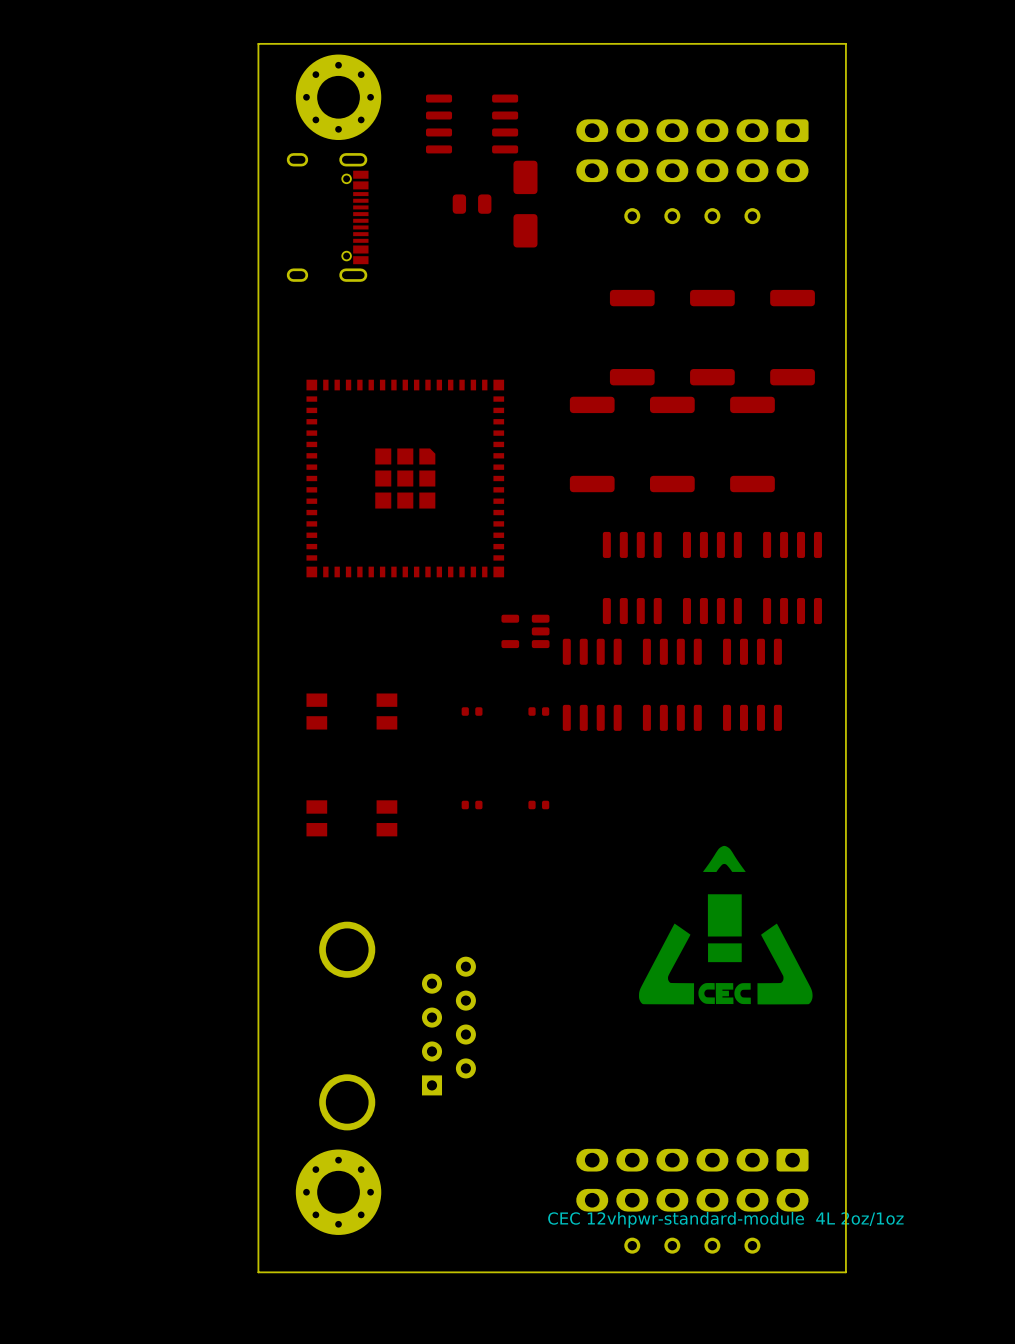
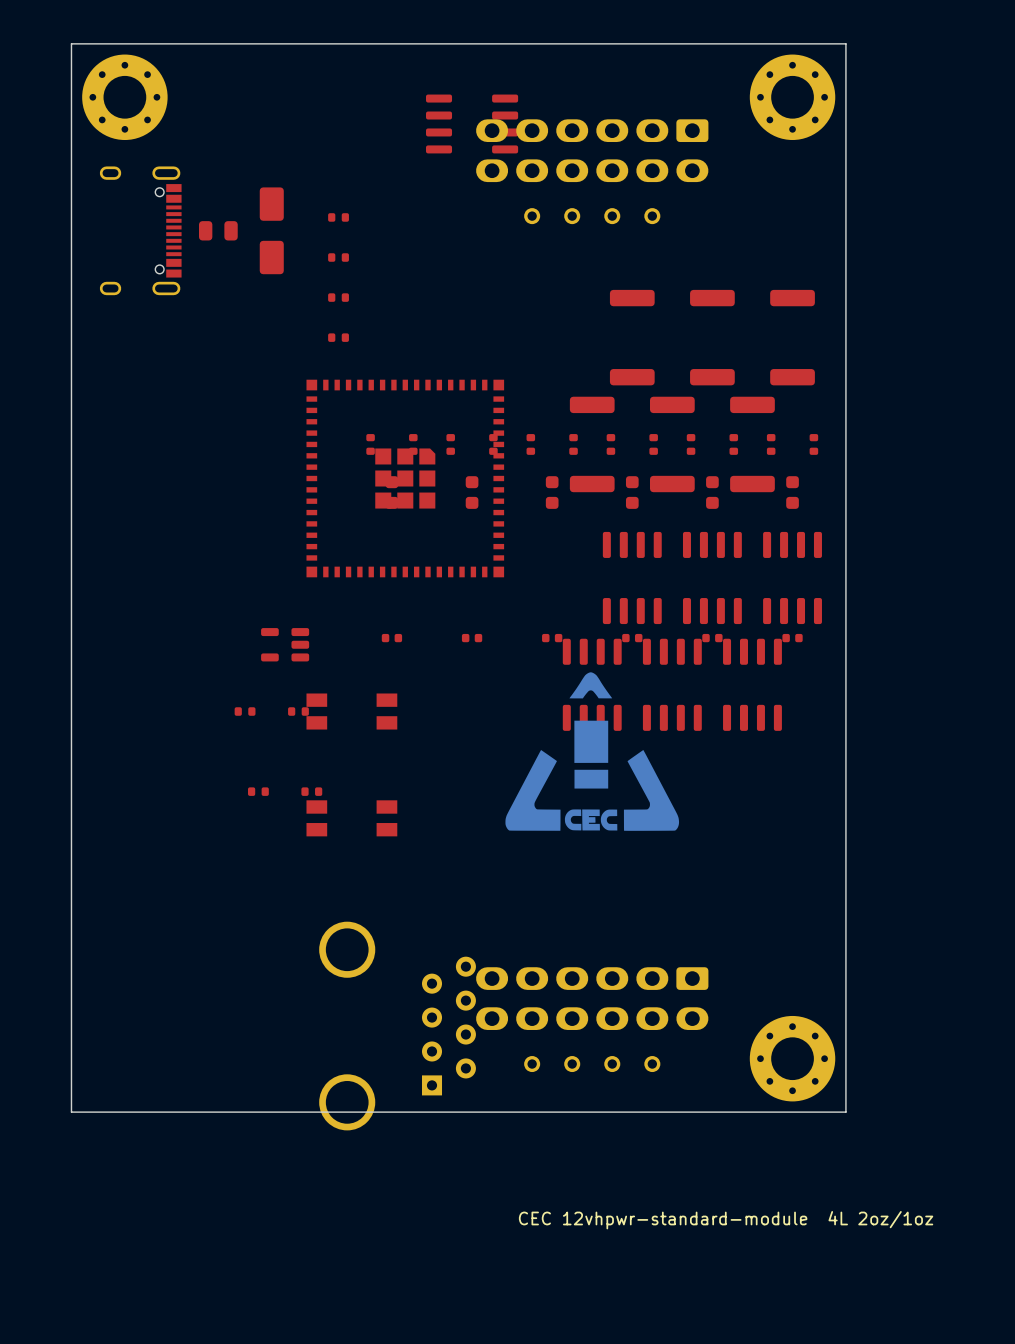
board edge: (258, 43) (258, 1272) (845, 1272) (845, 1112) -> (258, 43) (71, 43) (71, 1112) (845, 1112)
part position: (338, 97) -> (124, 97)
part: none -> (792, 97)
part footprint: [286, 153, 369, 282] -> [328, 213, 349, 222]
part position: (692, 171) -> (592, 171)
part position: (472, 204) -> (218, 230)
part position: (525, 204) -> (271, 230)
part: none -> (140, 230)
part: none -> (338, 257)
part: none -> (338, 297)
part: none -> (338, 337)
part: none -> (370, 444)
part: none -> (413, 444)
part: none -> (450, 444)
part: none -> (493, 444)
part: none -> (530, 444)
part: none -> (573, 444)
part: none -> (610, 444)
part: none -> (653, 444)
part: none -> (691, 444)
part: none -> (733, 444)
part: none -> (771, 444)
part: none -> (813, 444)
part: none -> (391, 492)
part: none -> (472, 492)
part: none -> (552, 492)
part: none -> (632, 492)
part: none -> (712, 492)
part: none -> (792, 492)
part position: (525, 631) -> (285, 644)
part: none -> (391, 638)
part: none -> (472, 638)
part: none -> (552, 638)
part: none -> (632, 638)
part: none -> (712, 638)
part: none -> (792, 638)
part: none -> (245, 711)
part: none -> (298, 711)
part: (472, 711) -> none
part: (538, 711) -> none
part: none -> (258, 791)
part: none -> (311, 791)
part: (472, 804) -> none
part: (538, 804) -> none
drawing position: (725, 925) -> (592, 751)
part: none -> (792, 1058)
part: (338, 1192) -> none
part position: (692, 1201) -> (592, 1019)

